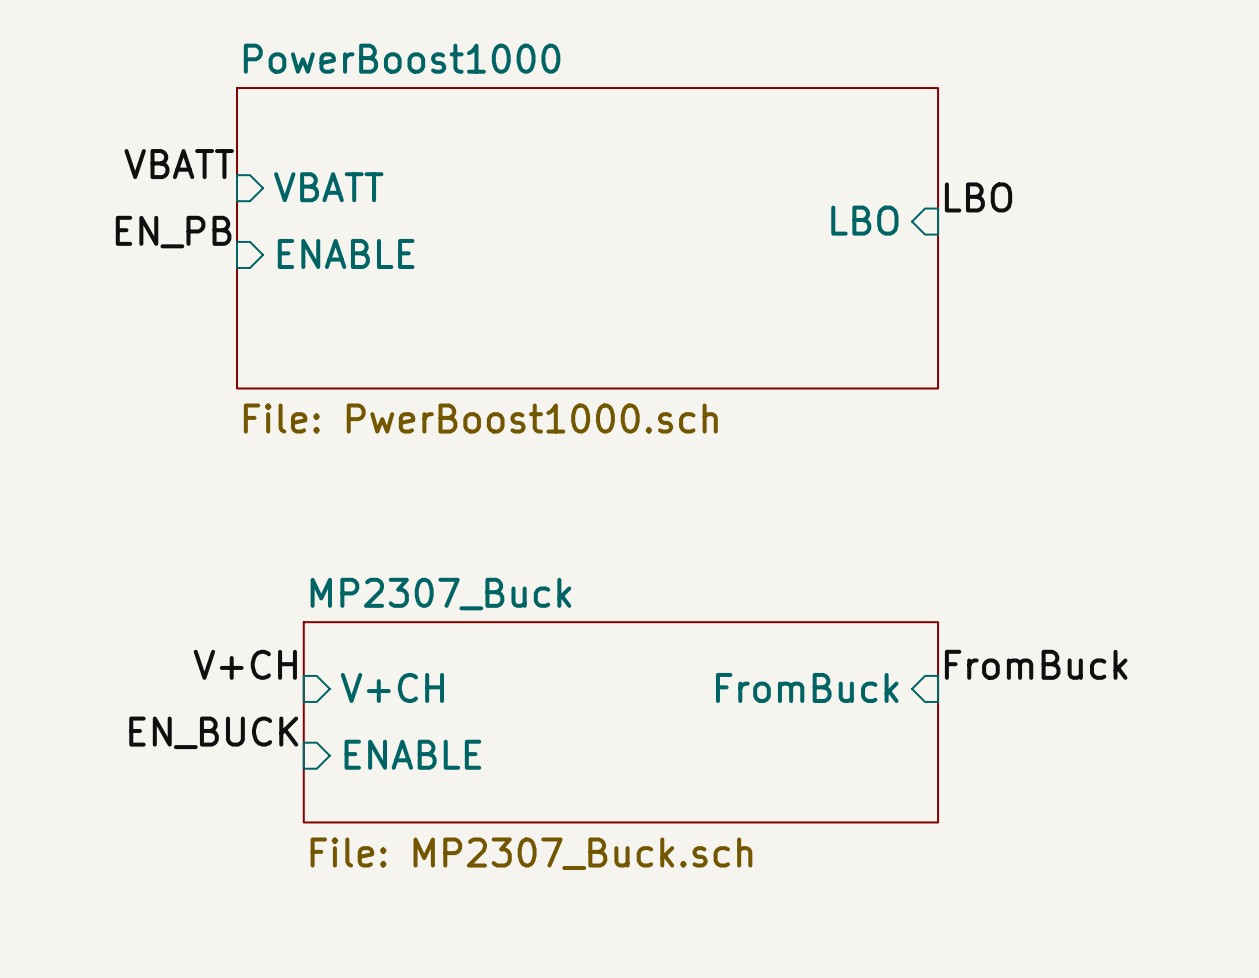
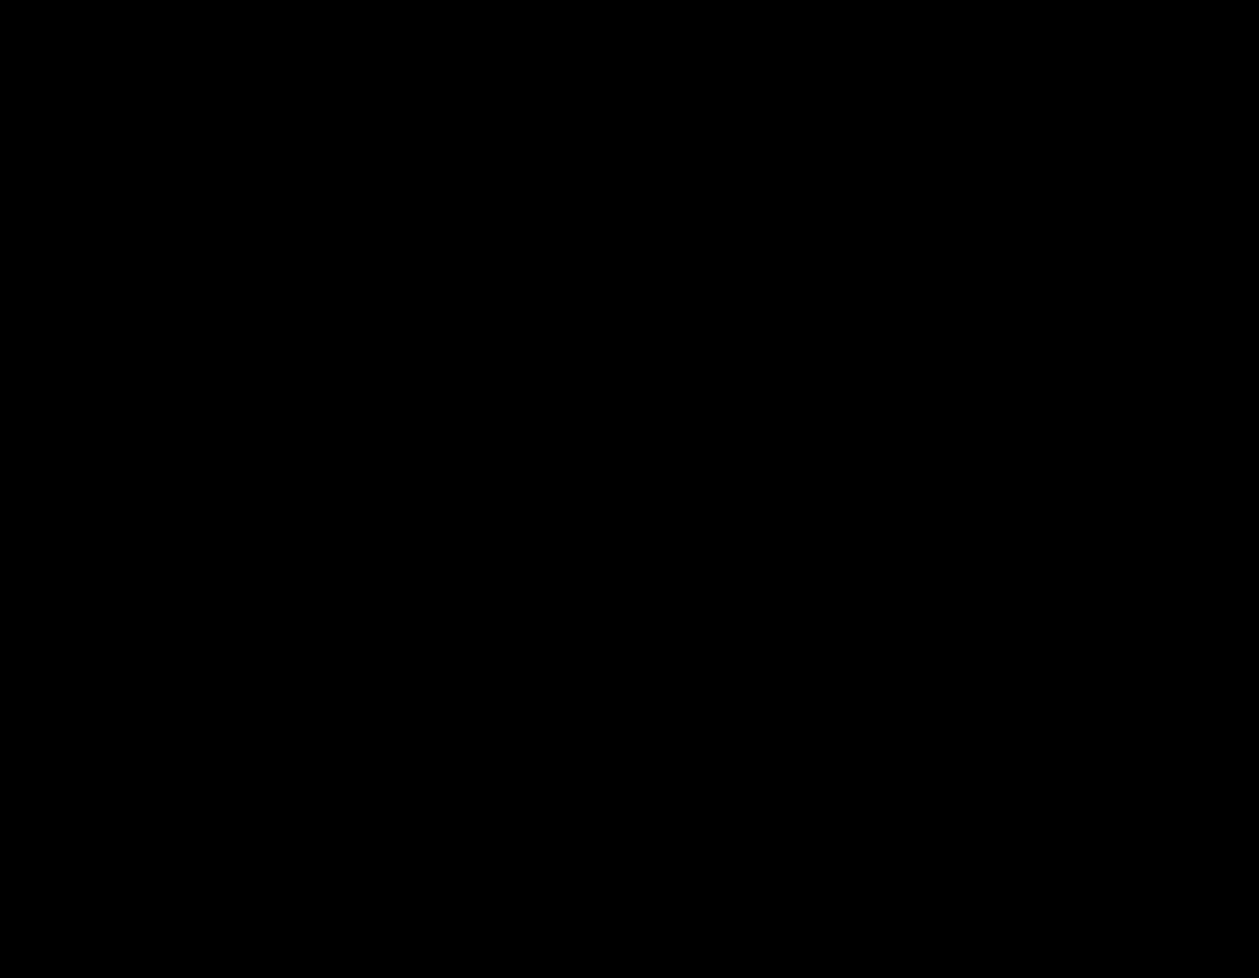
label: VBATT (179, 164) -> none
sheet pin: VBATT (328, 187) -> none
label: LBO (978, 197) -> none
sheet pin: LBO (864, 220) -> none
label: EN_PB (173, 232) -> none
sheet PowerBoost1000: File: PwerBoost1000.sch (587, 238) -> none
sheet pin: ENABLE (346, 253) -> none
label: V+CH (245, 664) -> none
label: FromBuck (1036, 664) -> none
sheet pin: V+CH (392, 687) -> none
sheet pin: FromBuck (807, 687) -> none
sheet MP2307_Buck: File: MP2307_Buck.sch (620, 722) -> none
label: EN_BUCK (213, 732) -> none
sheet pin: ENABLE (412, 754) -> none

